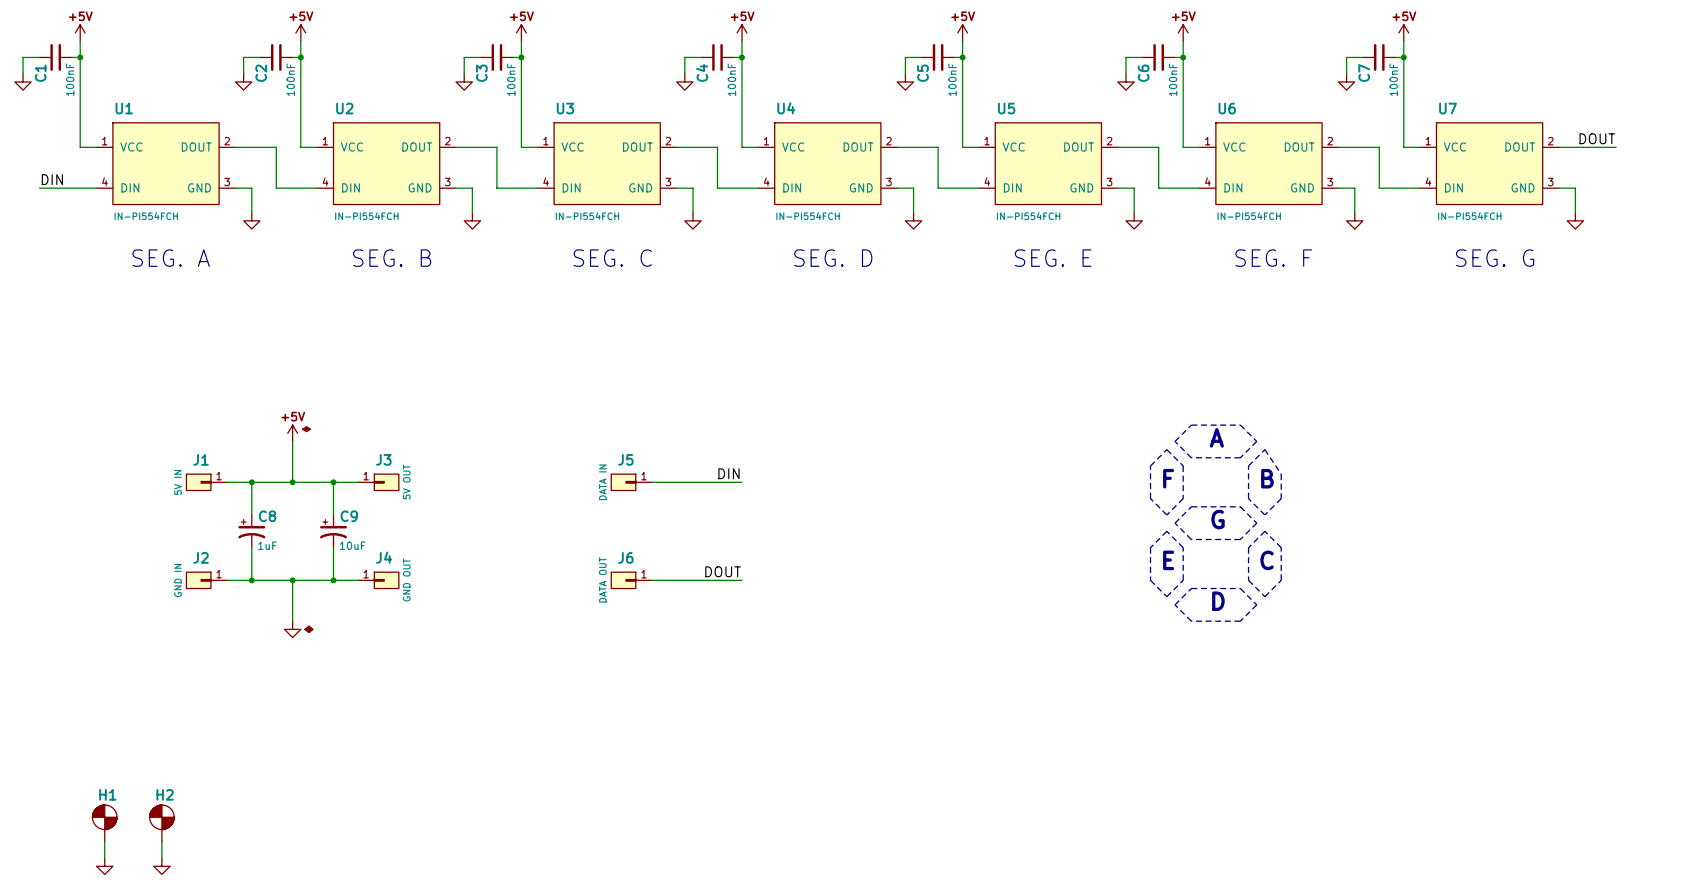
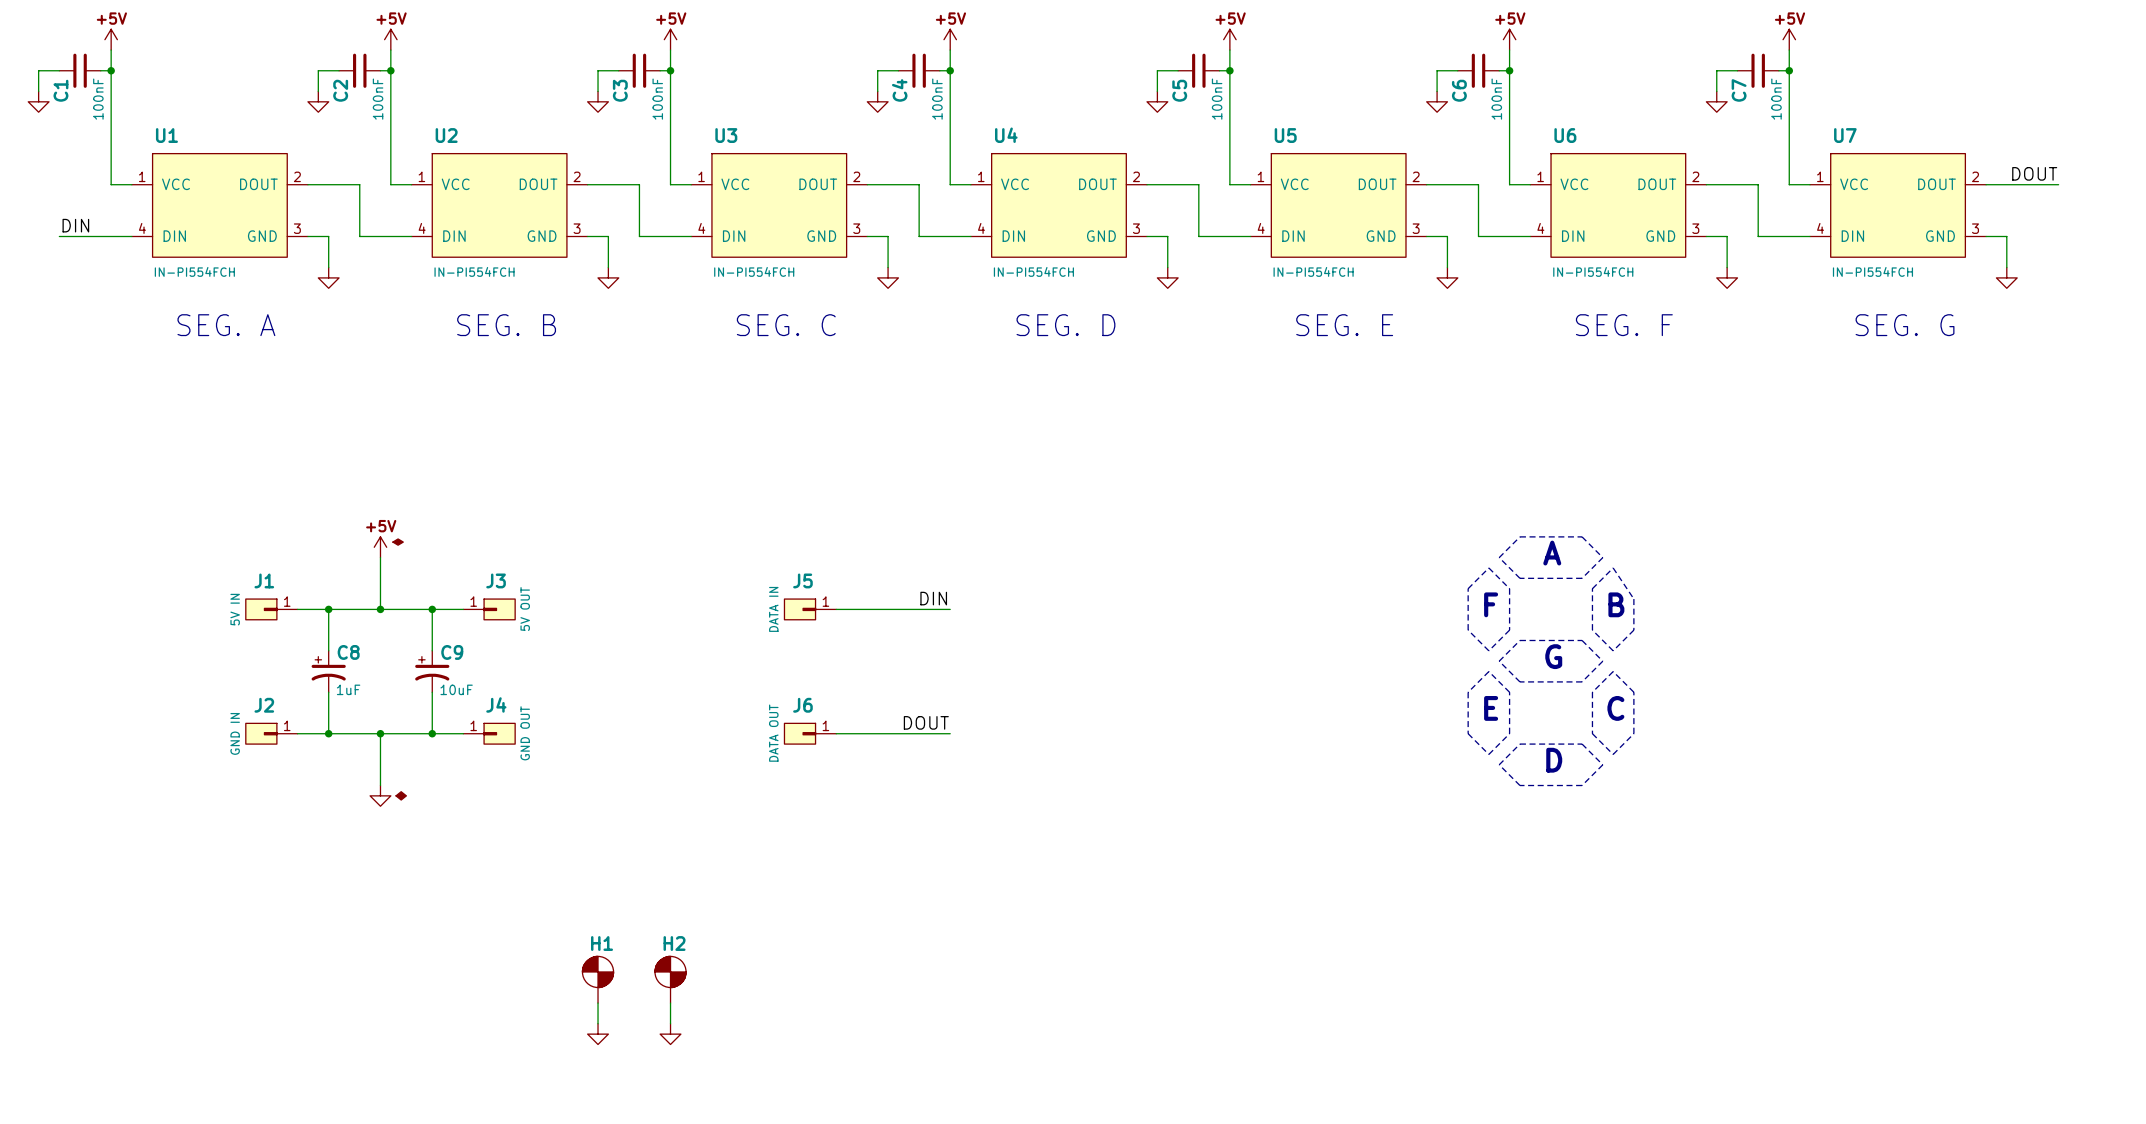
wire: none -> (598, 1003) (598, 1023)
wire: none -> (670, 1003) (670, 1023)
power symbol: none -> (598, 1034)
power symbol: none -> (670, 1034)
H1 position: (104, 823) -> (598, 979)
H2 position: (161, 823) -> (670, 979)
wire: (104, 841) (104, 858) -> none
wire: (161, 841) (161, 858) -> none
power symbol: (104, 866) -> none
power symbol: (161, 866) -> none

